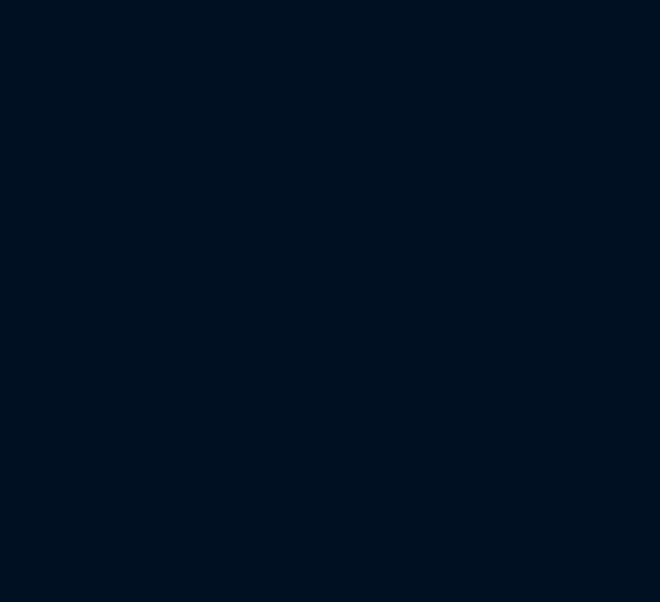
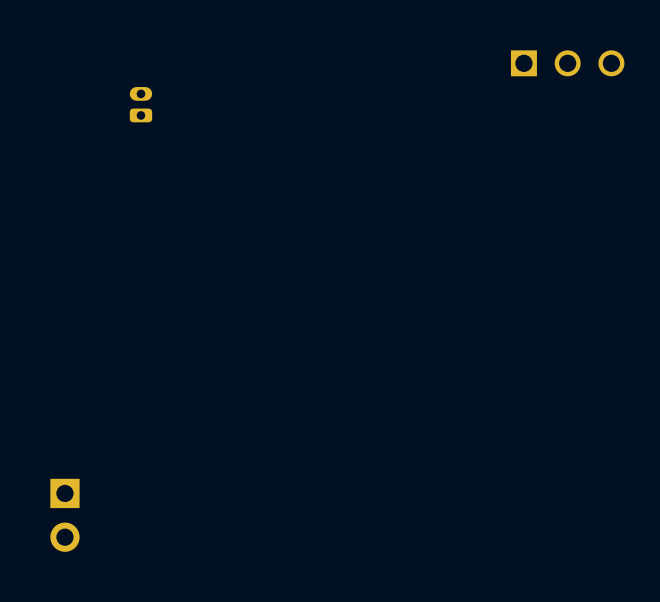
part: none -> (567, 63)
part: none -> (140, 104)
part: none -> (64, 515)

